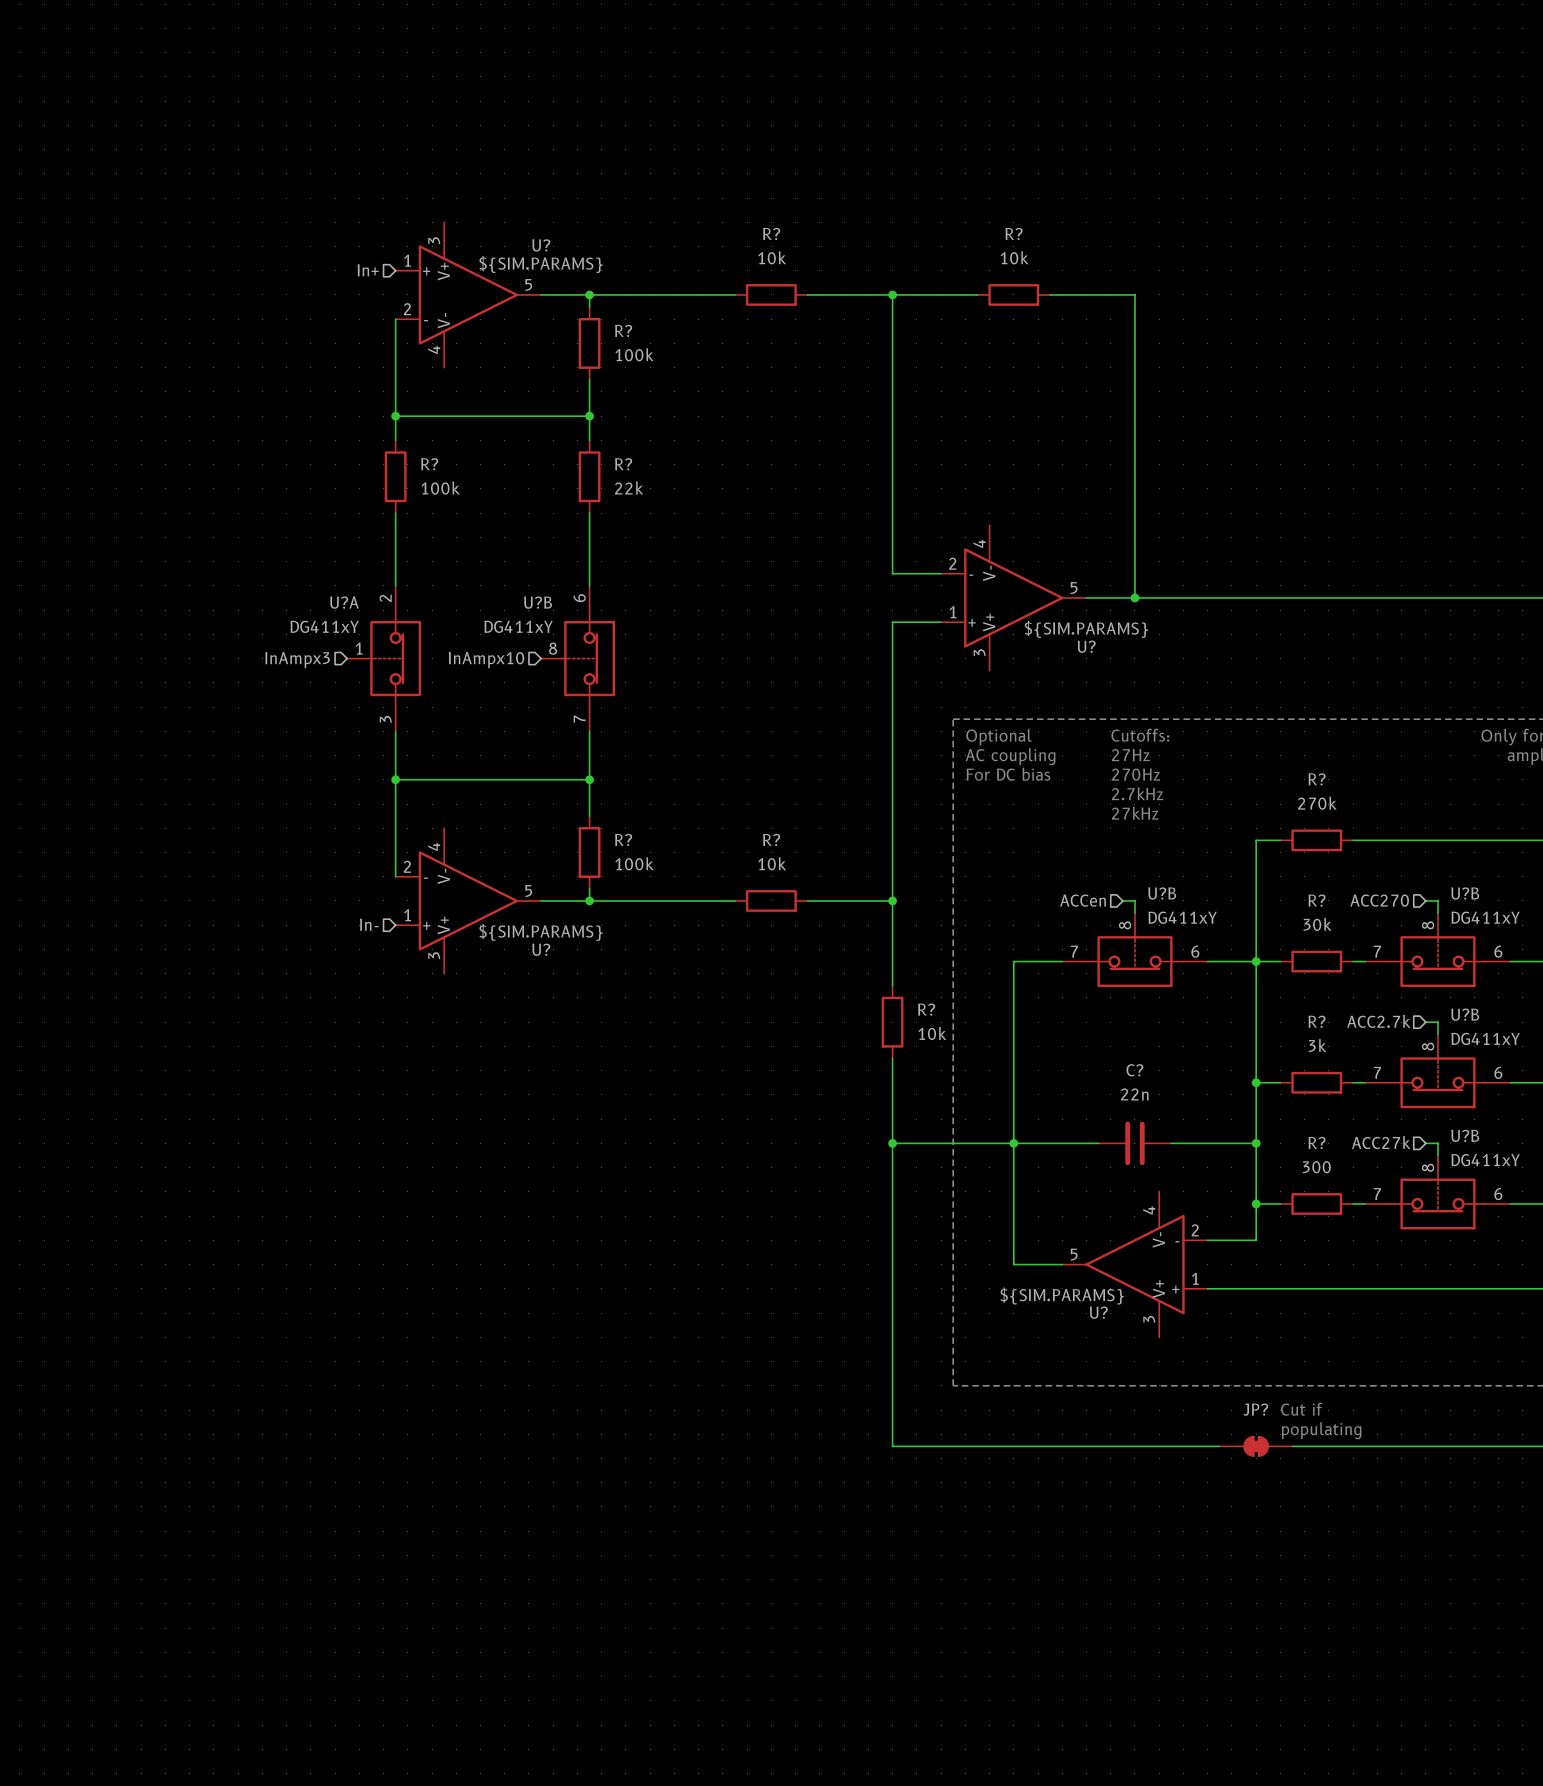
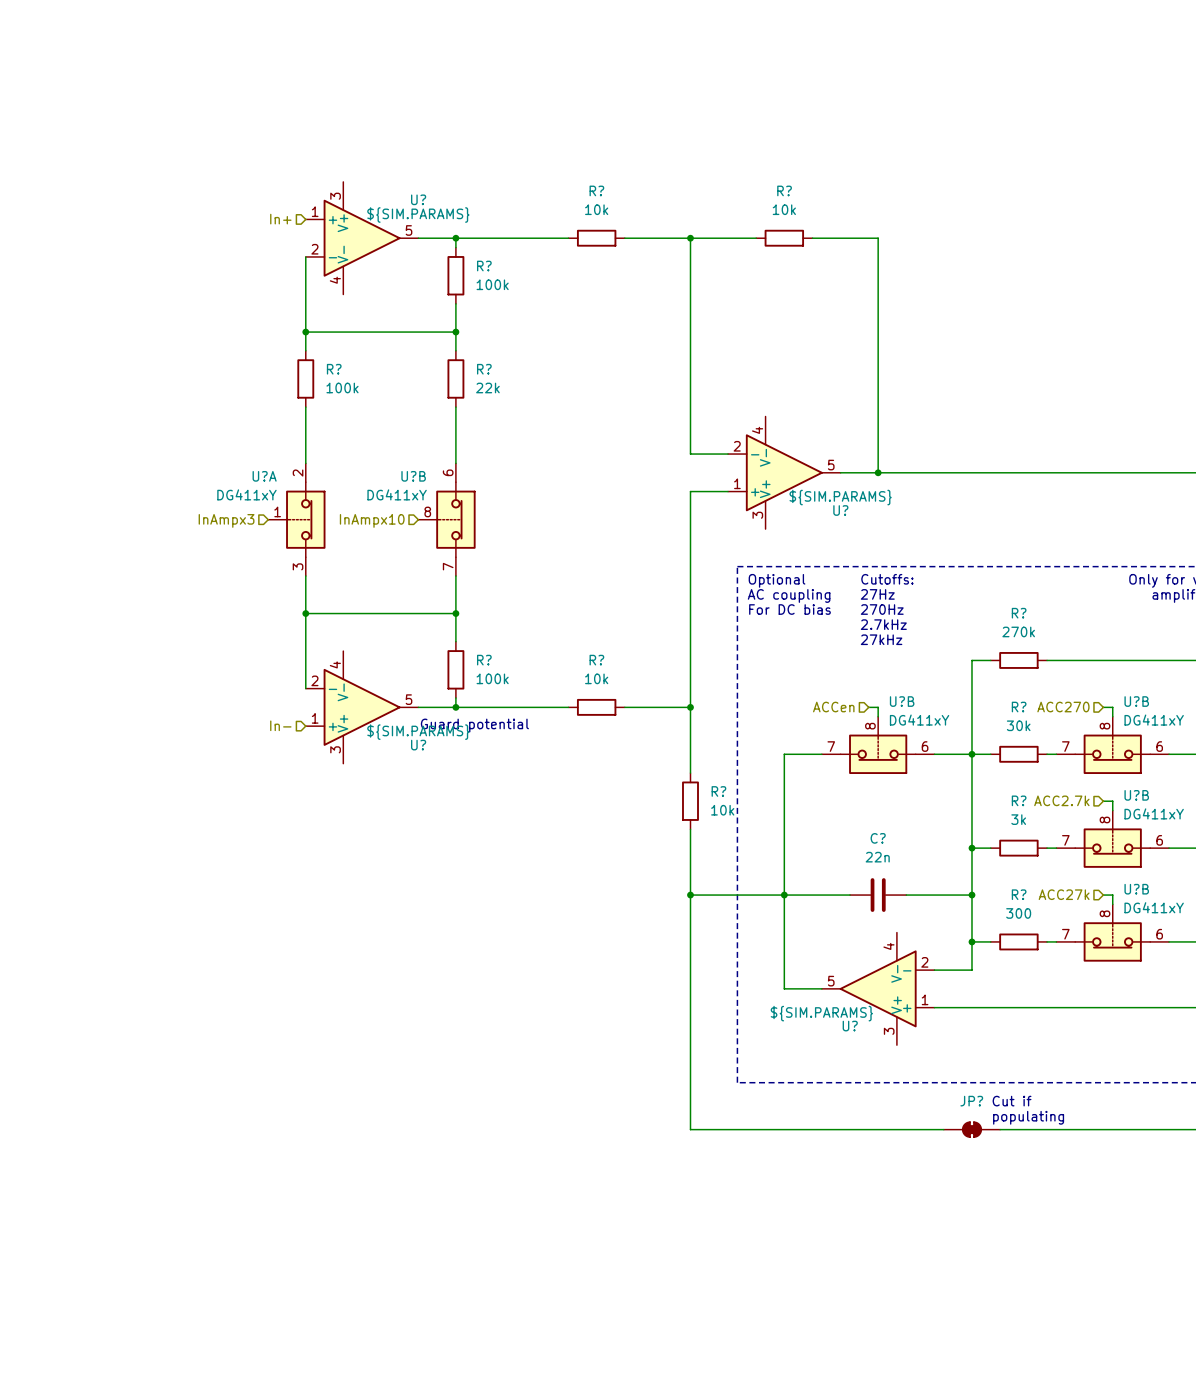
text: none -> Guard potential (474, 725)

